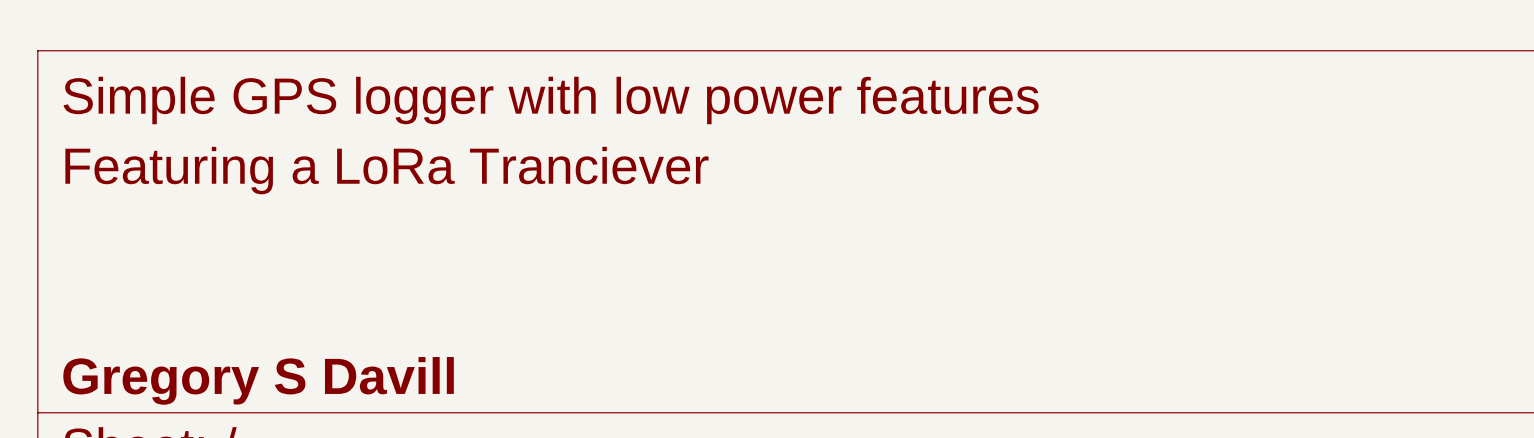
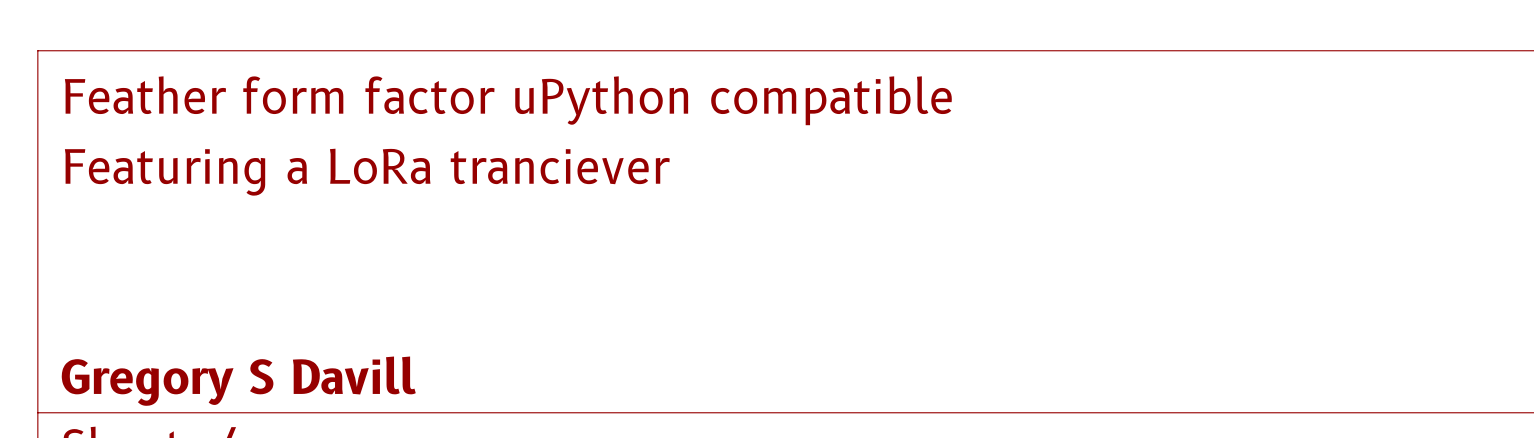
title block: Simple GPS logger with low power features (551, 100) -> Feather form factor uPython compatible (508, 100)
title block: Featuring a LoRa Tranciever (386, 170) -> Featuring a LoRa tranciever (367, 172)

